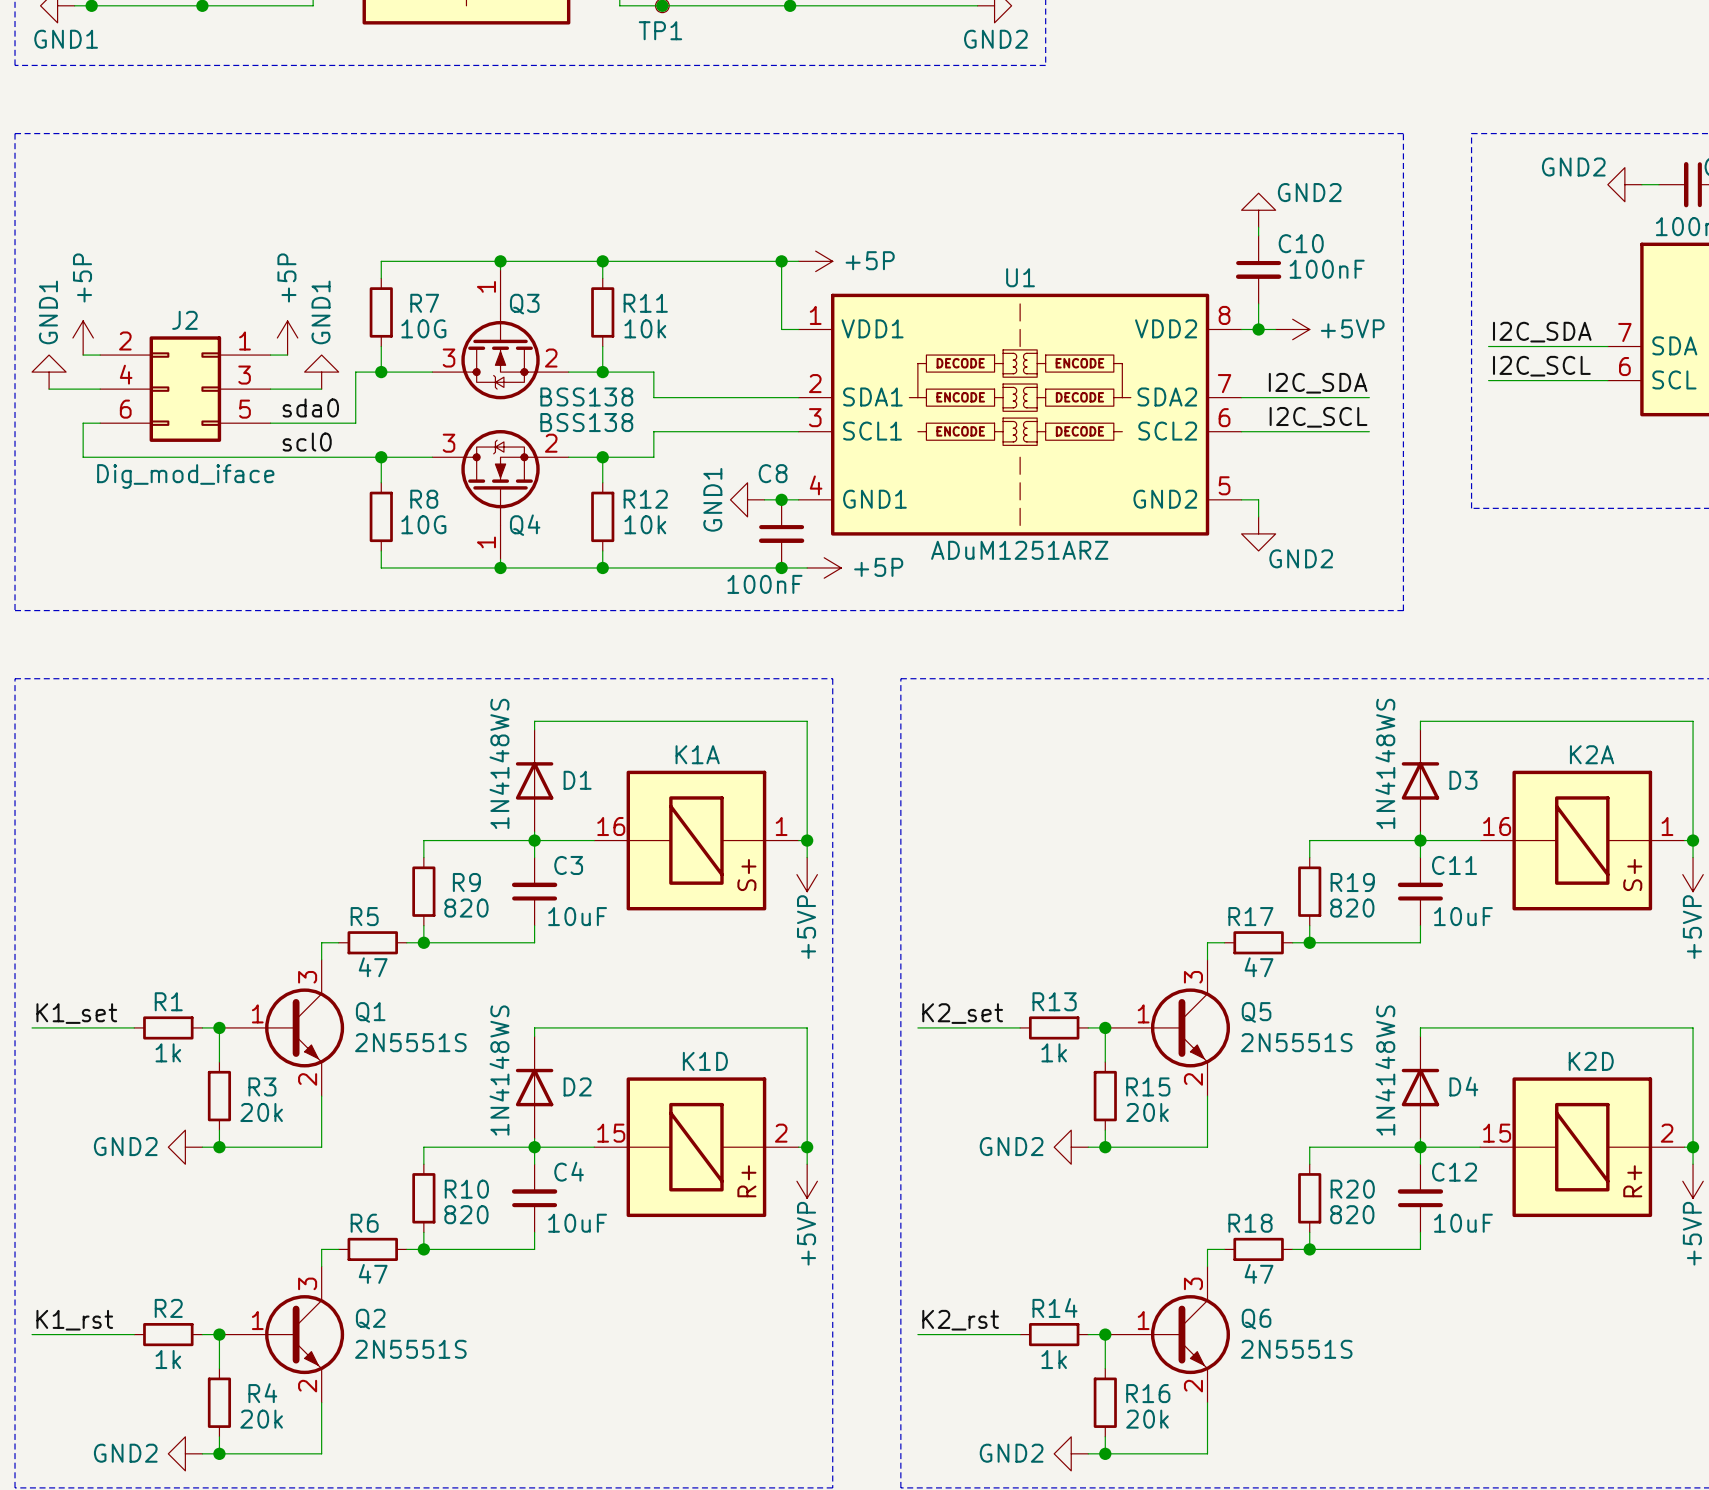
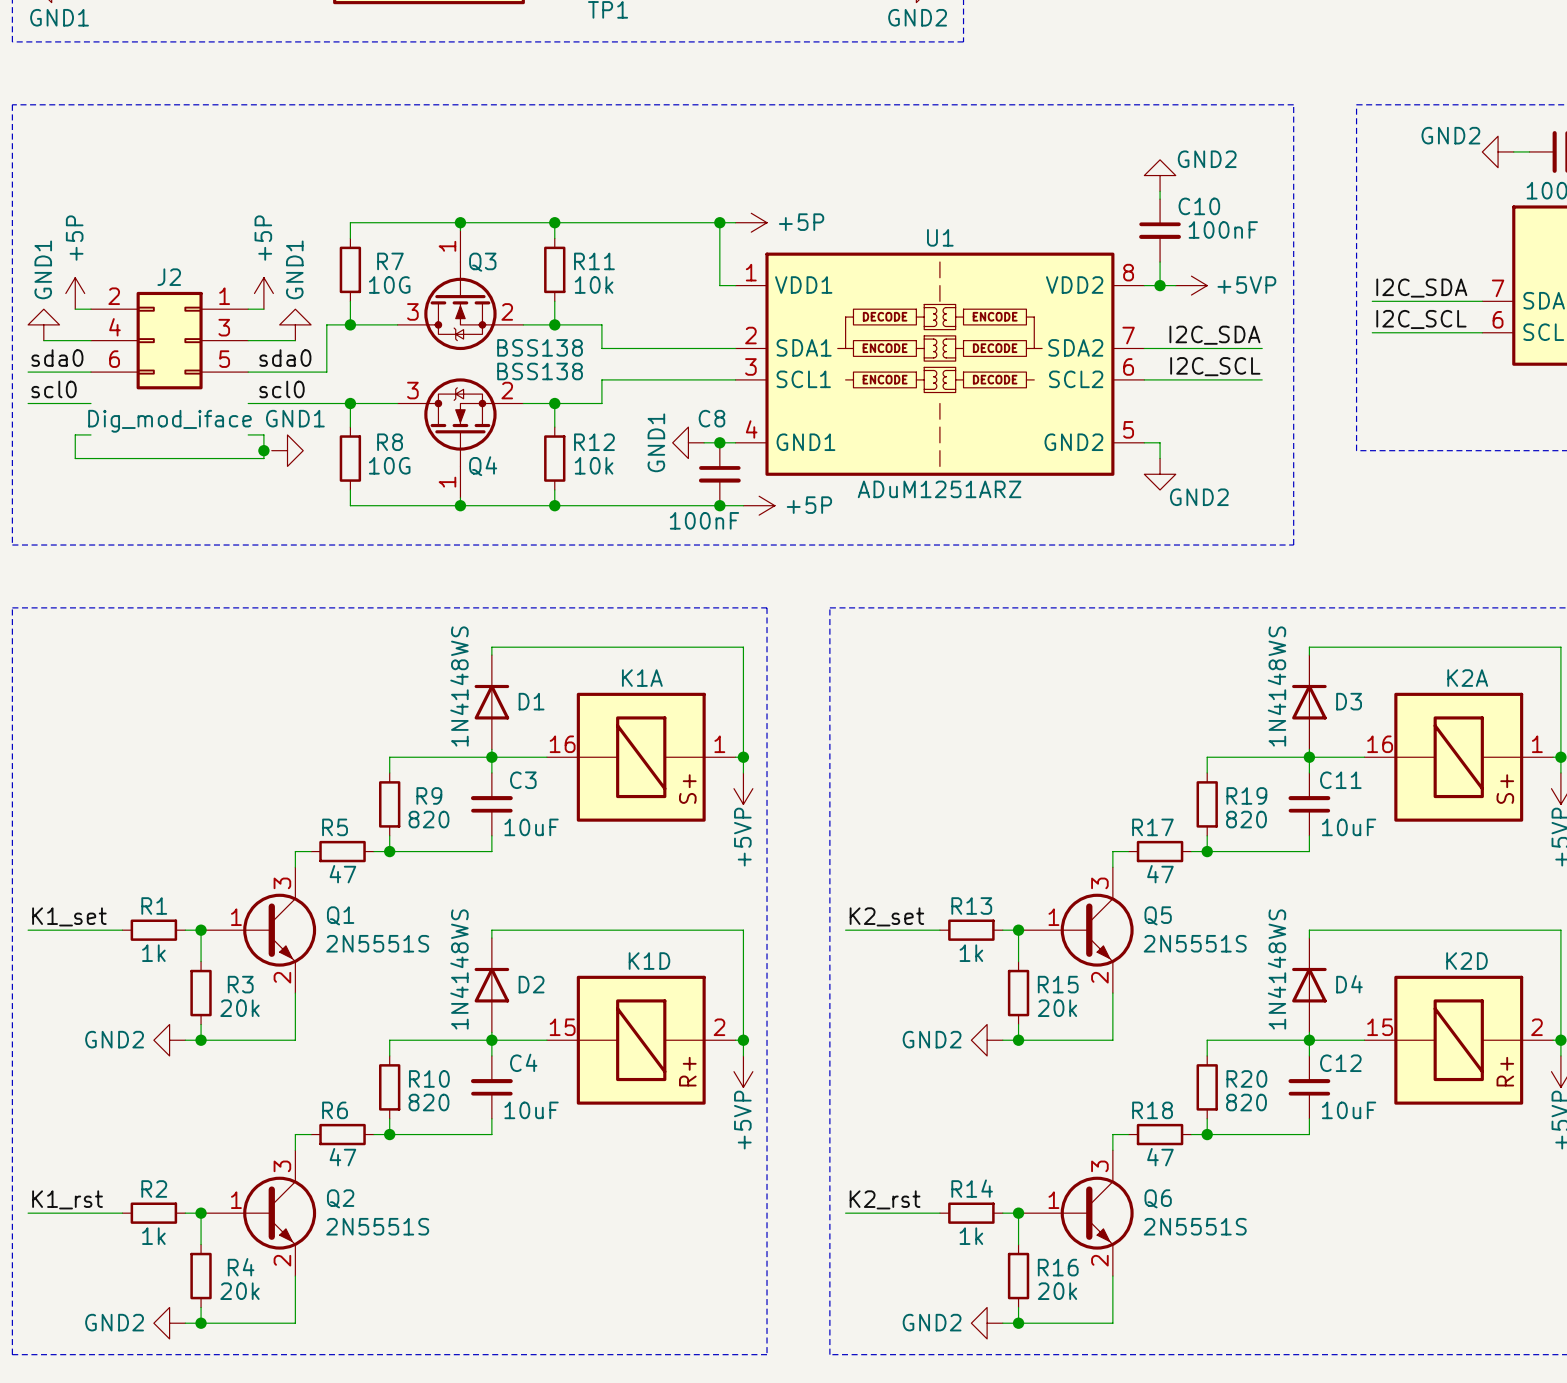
label: none -> sda0 (57, 358)
wire: (83, 423) (83, 457) -> (75, 372) (28, 372)
label: none -> scl0 (54, 389)
wire: none -> (28, 403) (75, 403)
wire: (100, 457) (270, 457) -> none
wire: none -> (90, 434) (75, 434) (75, 458) (263, 458) (263, 434) (248, 434)
junction: none -> (263, 450)
power symbol: none -> GND1 (287, 450)

